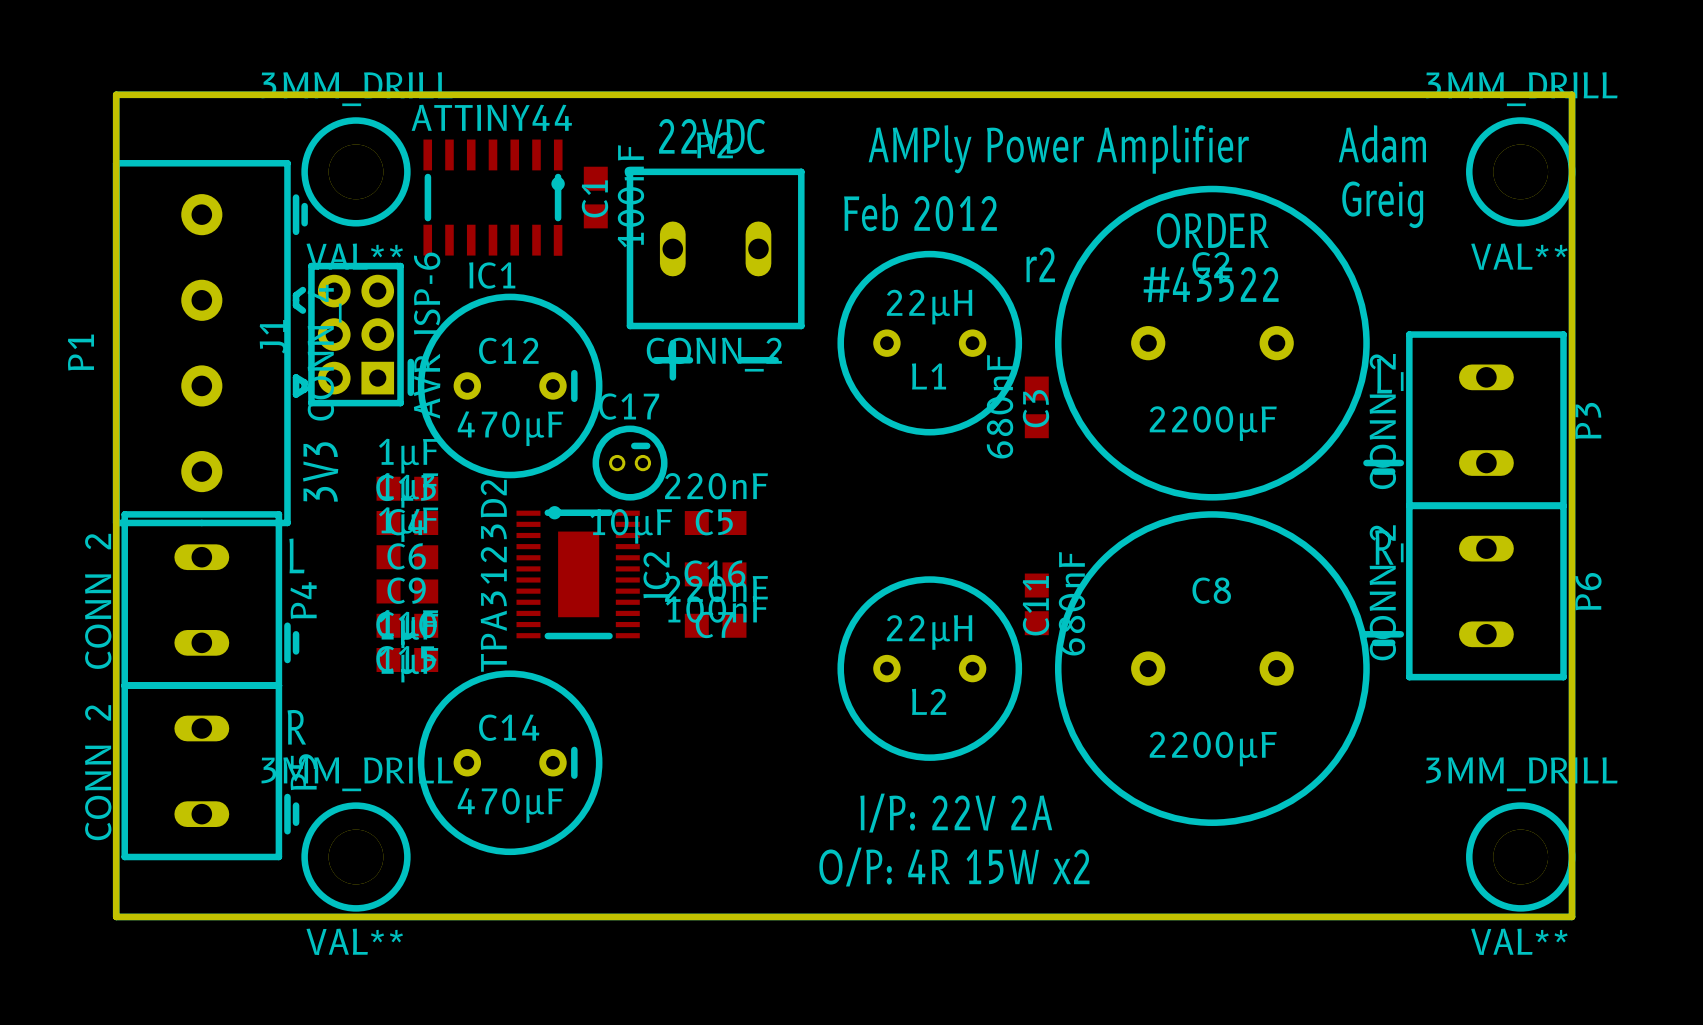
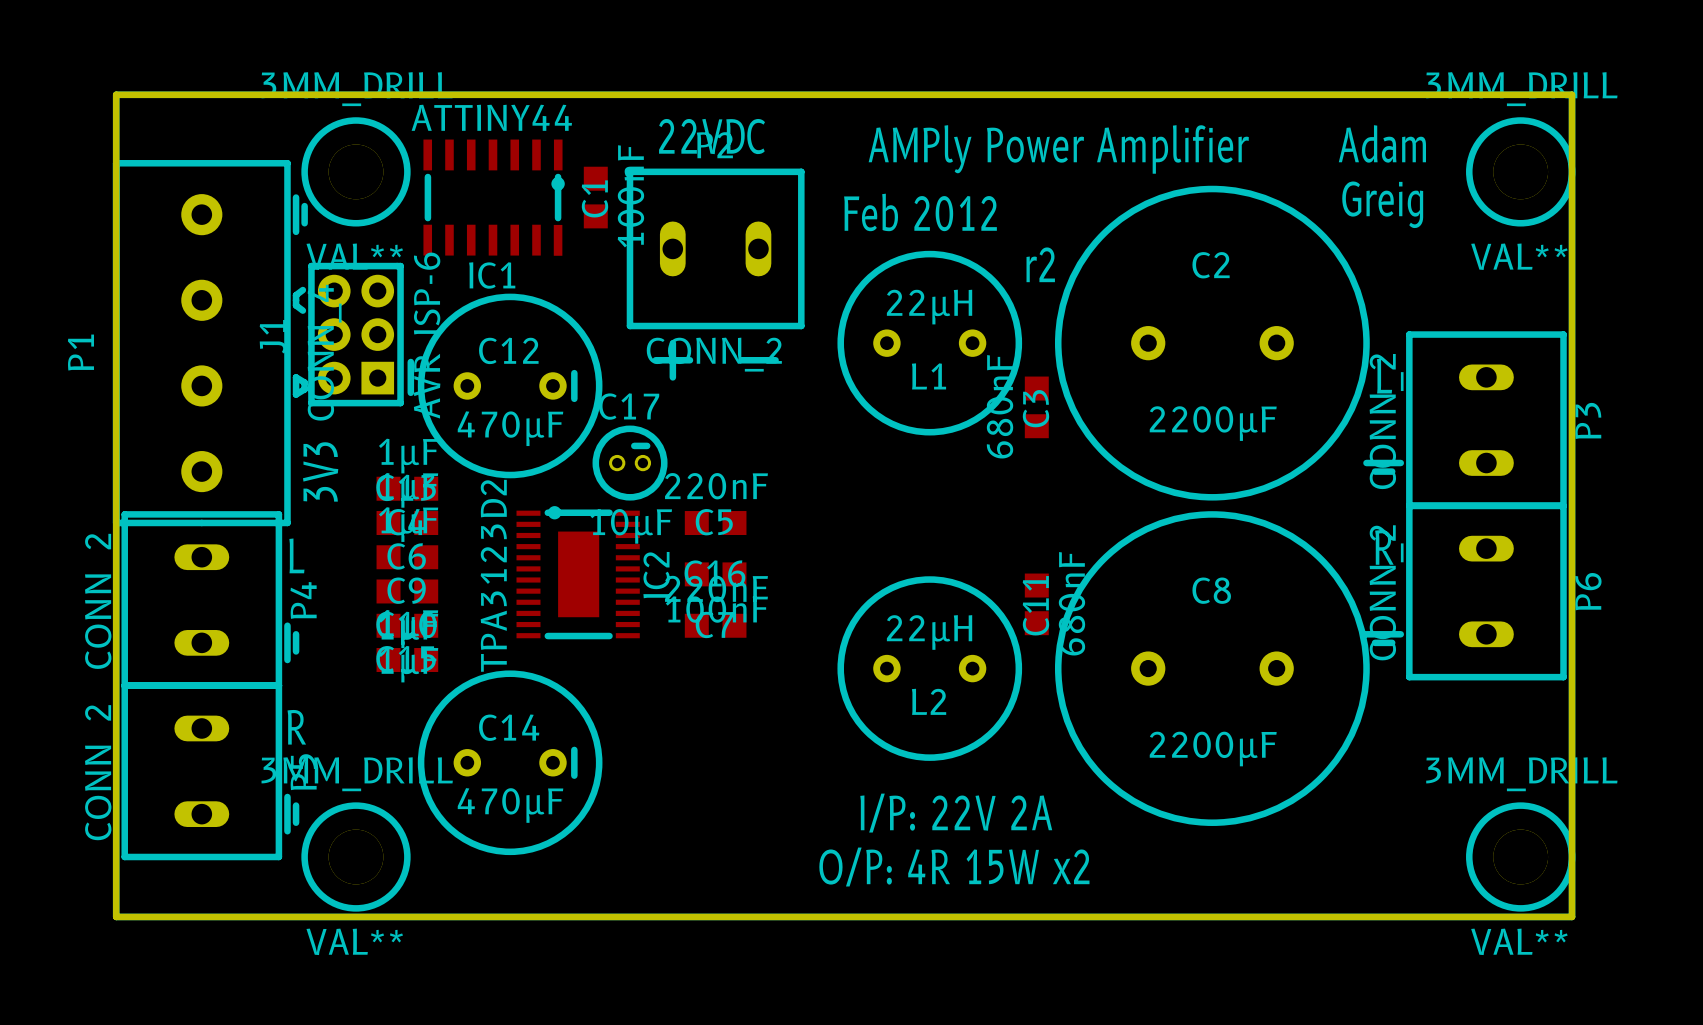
text: ORDER (1212, 230) -> none
text: #43522 (1211, 284) -> none

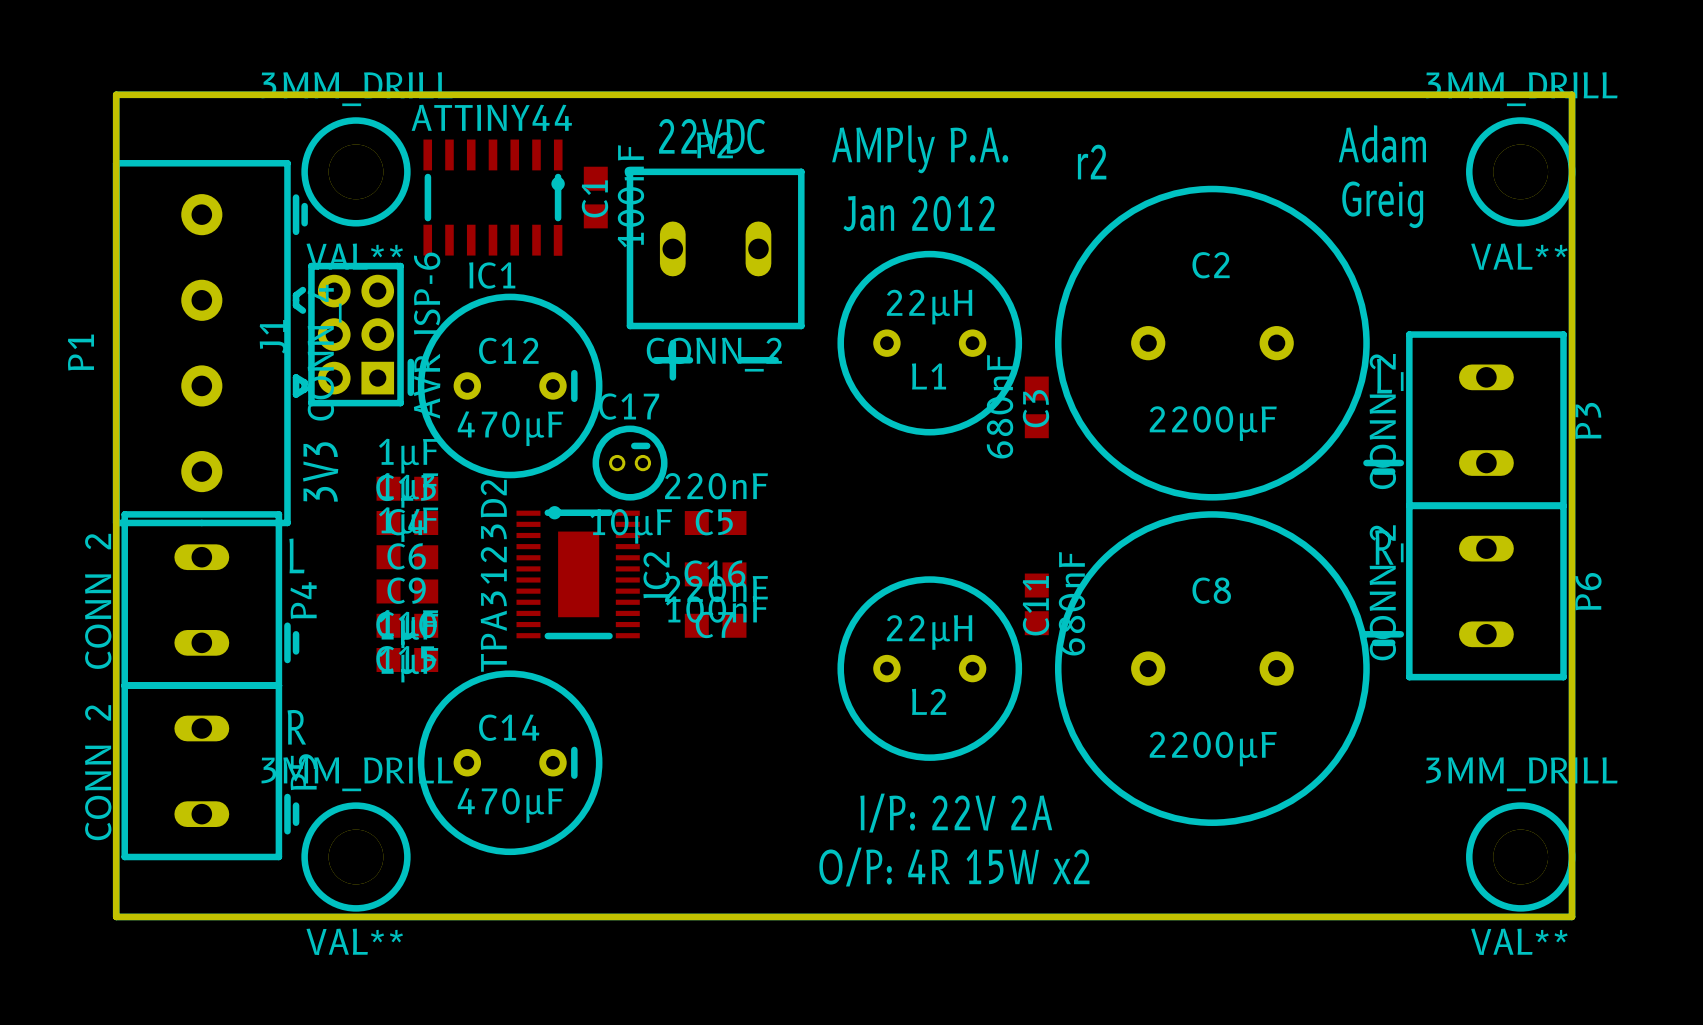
text: none -> AMPly P.A. (920, 149)
text: AMPly Power Amplifier (1058, 149) -> none
text: Feb 2012 (920, 212) -> Jan 2012 (919, 213)
text position: r2 (1040, 264) -> r2 (1092, 162)

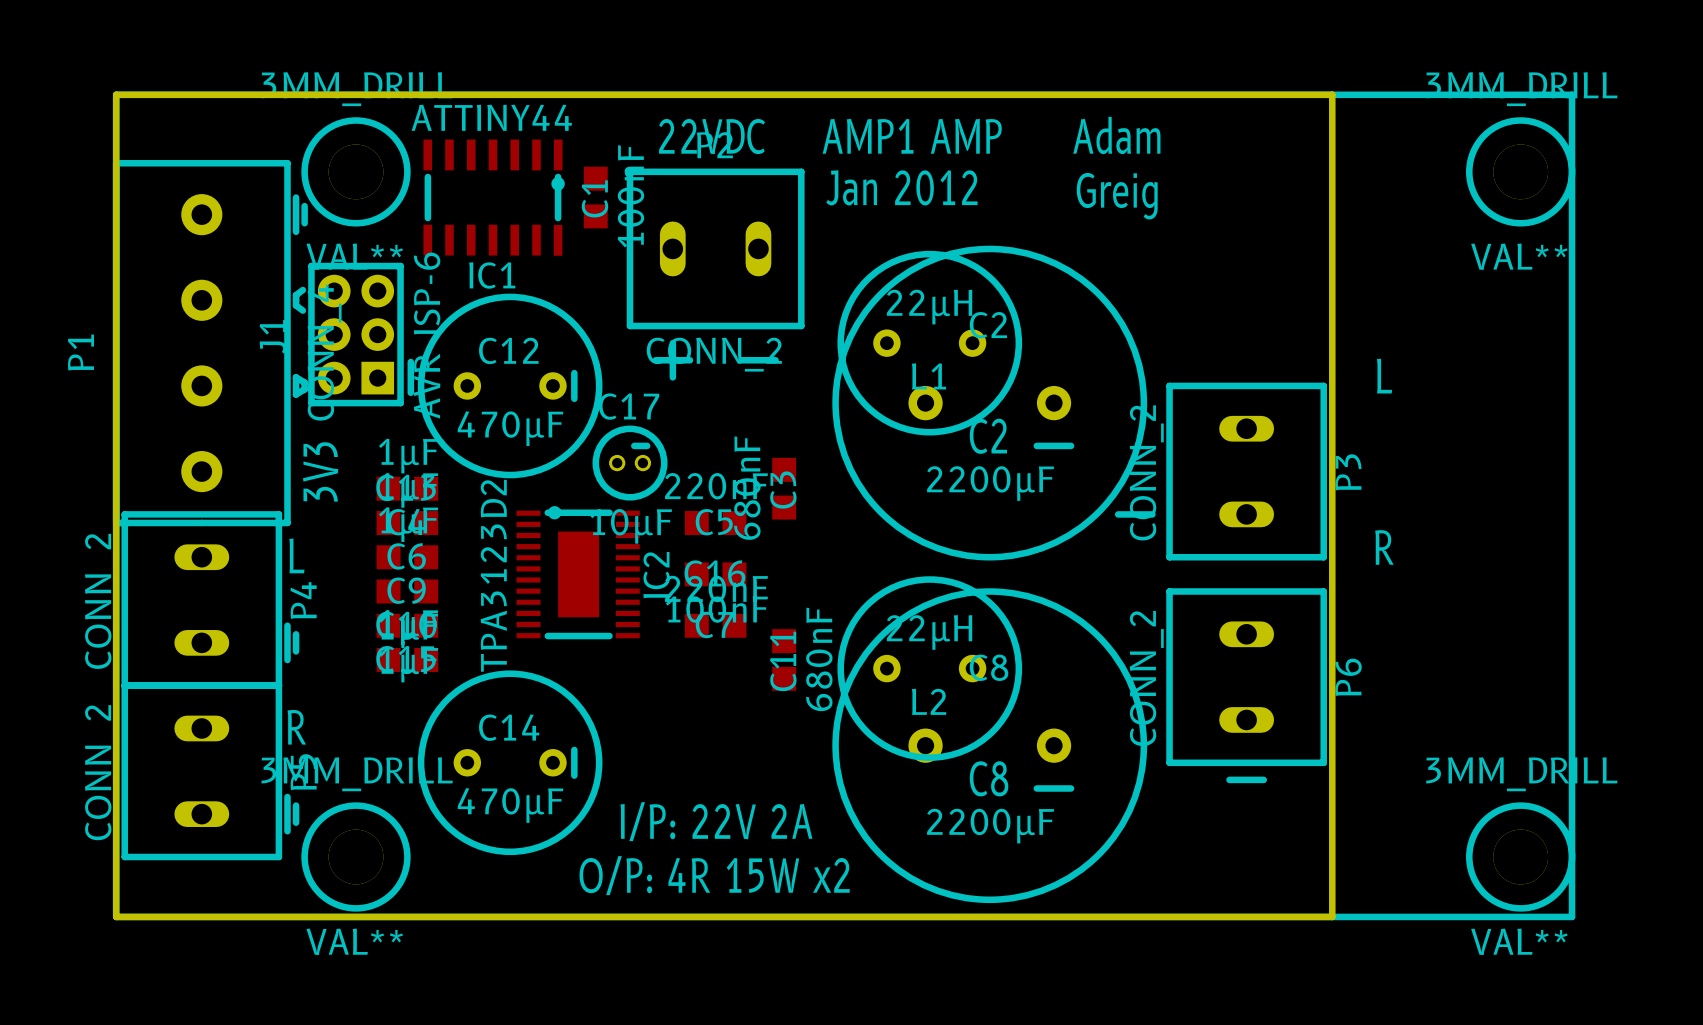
board edge: (1332, 94) (1572, 94) (1572, 916) (1332, 916) -> (1332, 94) (1332, 916)
text position: Adam (1382, 143) -> Adam (1116, 135)
text: AMPly P.A. (920, 149) -> AMP1 AMP (912, 136)
text: r2 (1092, 162) -> none
text position: Greig (1382, 204) -> Greig (1117, 196)
text position: Jan 2012 (919, 213) -> Jan 2012 (901, 187)
C2 position: (1212, 343) -> (989, 403)
C3 position: (1036, 407) -> (784, 488)
P3 position: (1486, 420) -> (1246, 471)
text: none -> C2 (988, 436)
line: none -> (1036, 445) (1071, 445)
line: (1366, 463) (1400, 463) -> (1118, 514) (1152, 514)
line: (1375, 471) (1392, 471) -> none
P6 position: (1486, 591) -> (1246, 677)
C11 position: (1036, 604) -> (784, 660)
line: (1366, 634) (1400, 634) -> (1229, 779) (1263, 779)
line: (1375, 642) (1392, 642) -> none
C8 position: (1212, 668) -> (989, 745)
text: none -> C8 (989, 778)
line: none -> (1036, 788) (1071, 788)
text position: I/P: 22V 2A (956, 813) -> I/P: 22V 2A (716, 821)
text position: O/P: 4R 15W x2 (954, 867) -> O/P: 4R 15W x2 (714, 875)

